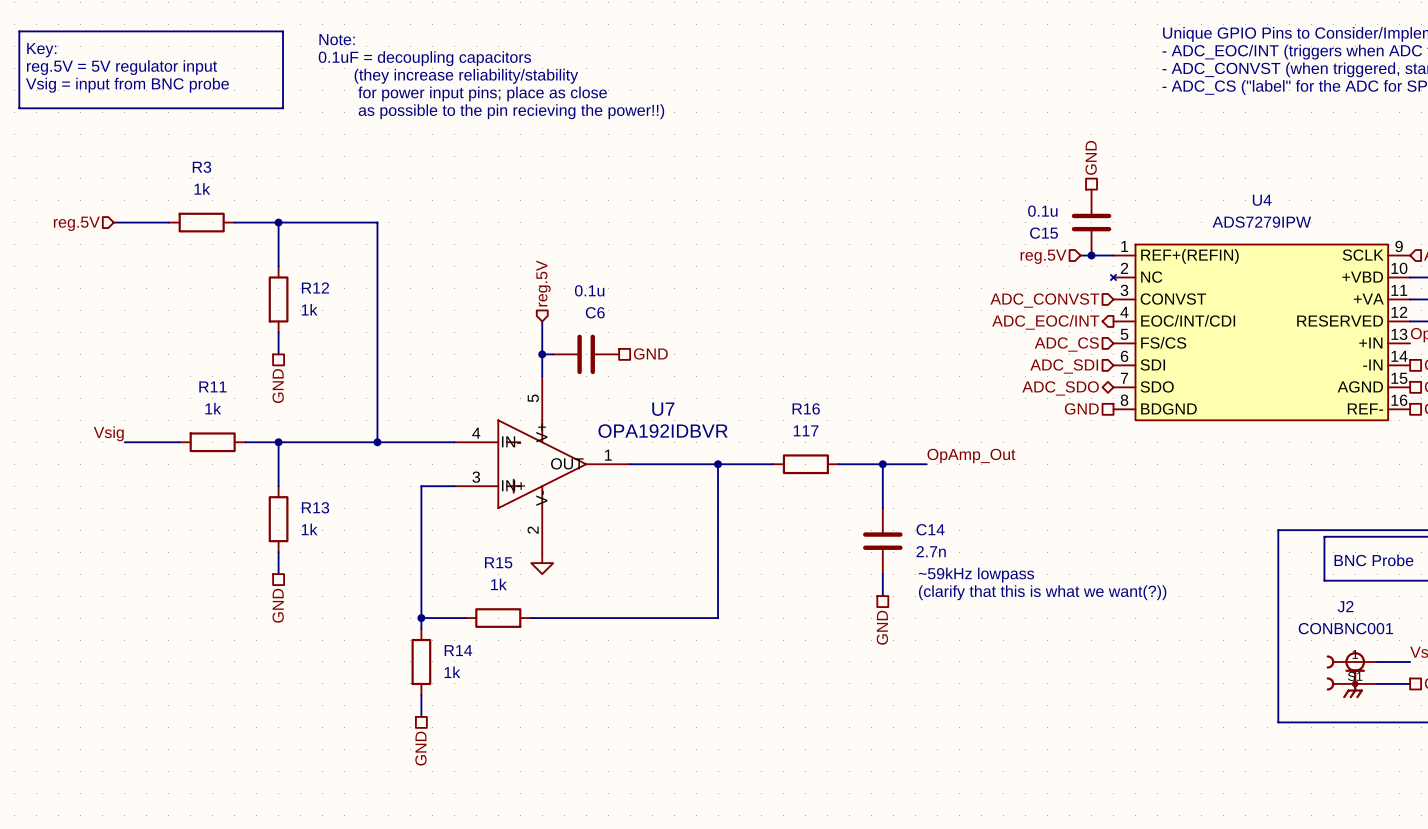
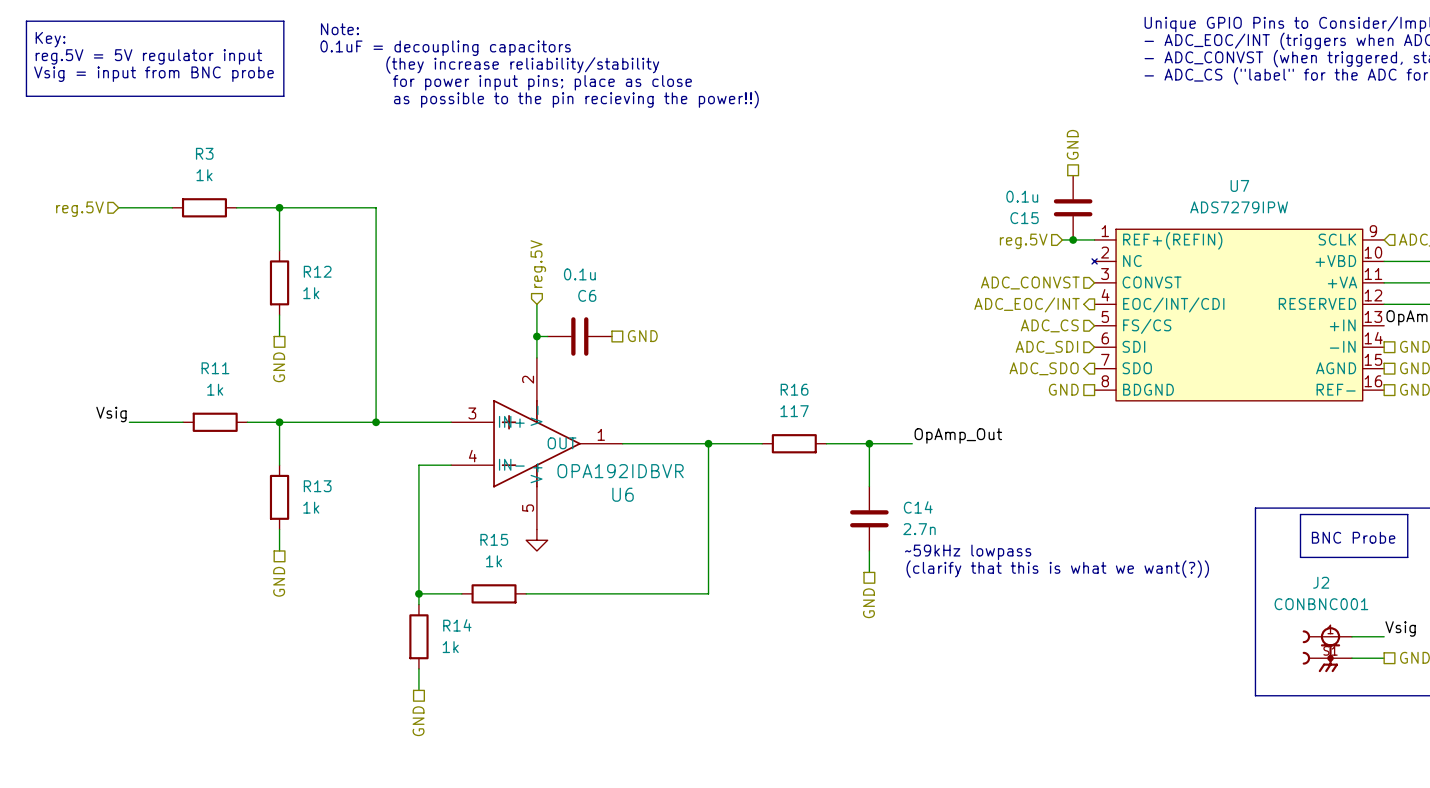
U4 name: U4 (1262, 200) -> U7 (1239, 185)
hierarchical label shape: bidirectional (1060, 388) -> output (1044, 368)
U7: OPA192IDBVR (542, 464) -> none
U6: none -> OPA192IDBVR (536, 443)

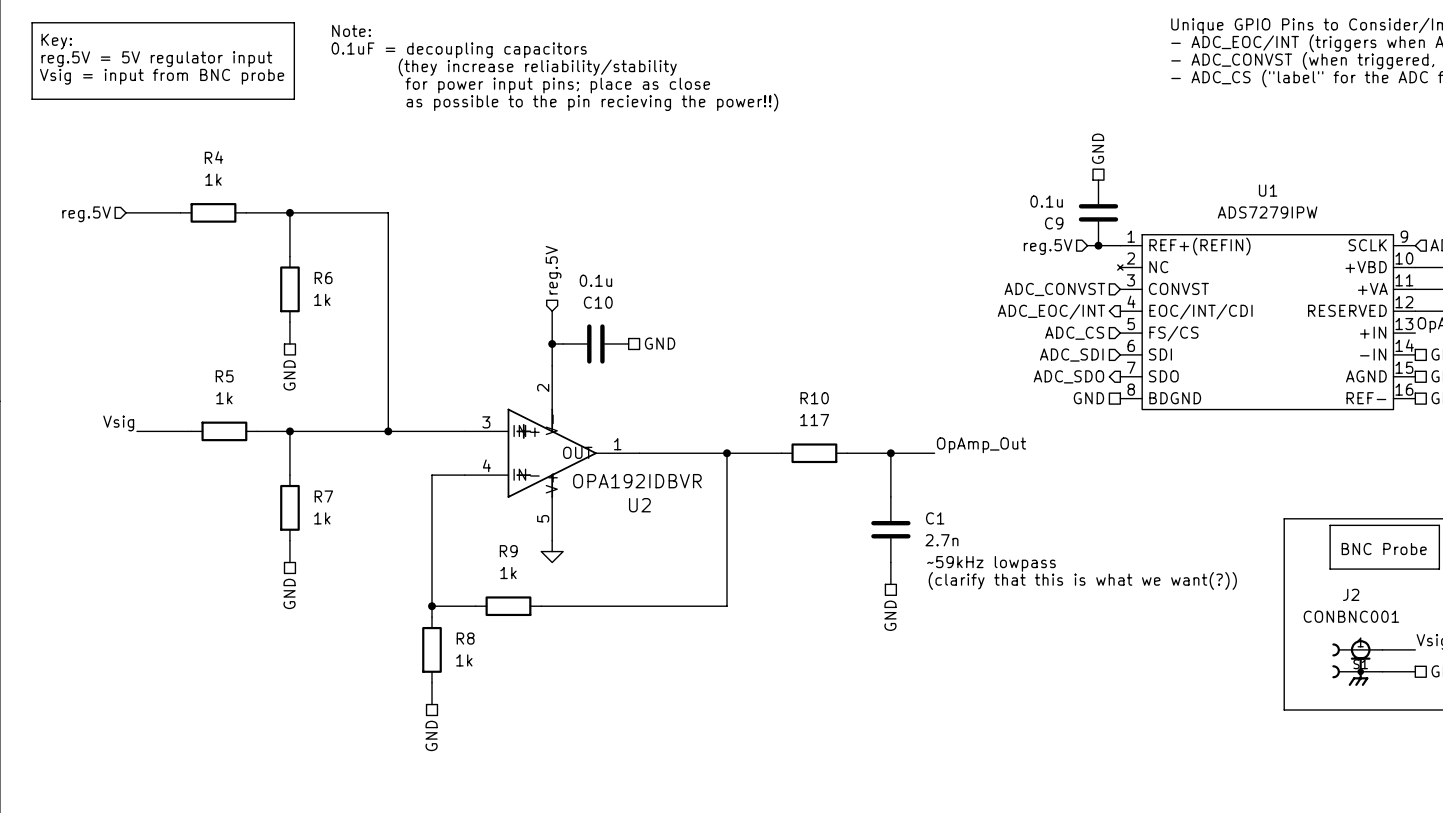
R3 name: R3 (204, 153) -> R4 (214, 157)
U7 name: U7 (1239, 185) -> U1 (1268, 190)
C15 name: C15 (1024, 218) -> C9 (1054, 223)
R12 name: R12 (317, 271) -> R6 (323, 278)
C6 name: C6 (587, 295) -> C10 (598, 302)
R11 name: R11 (215, 368) -> R5 (224, 376)
R16 name: R16 (794, 389) -> R10 (814, 398)
R13 name: R13 (317, 486) -> R7 (323, 496)
U6 name: U6 (623, 494) -> U2 (639, 505)
C14 name: C14 (918, 507) -> C1 (935, 518)
R15 name: R15 (494, 539) -> R9 (508, 551)
R14 name: R14 (457, 625) -> R8 (465, 638)

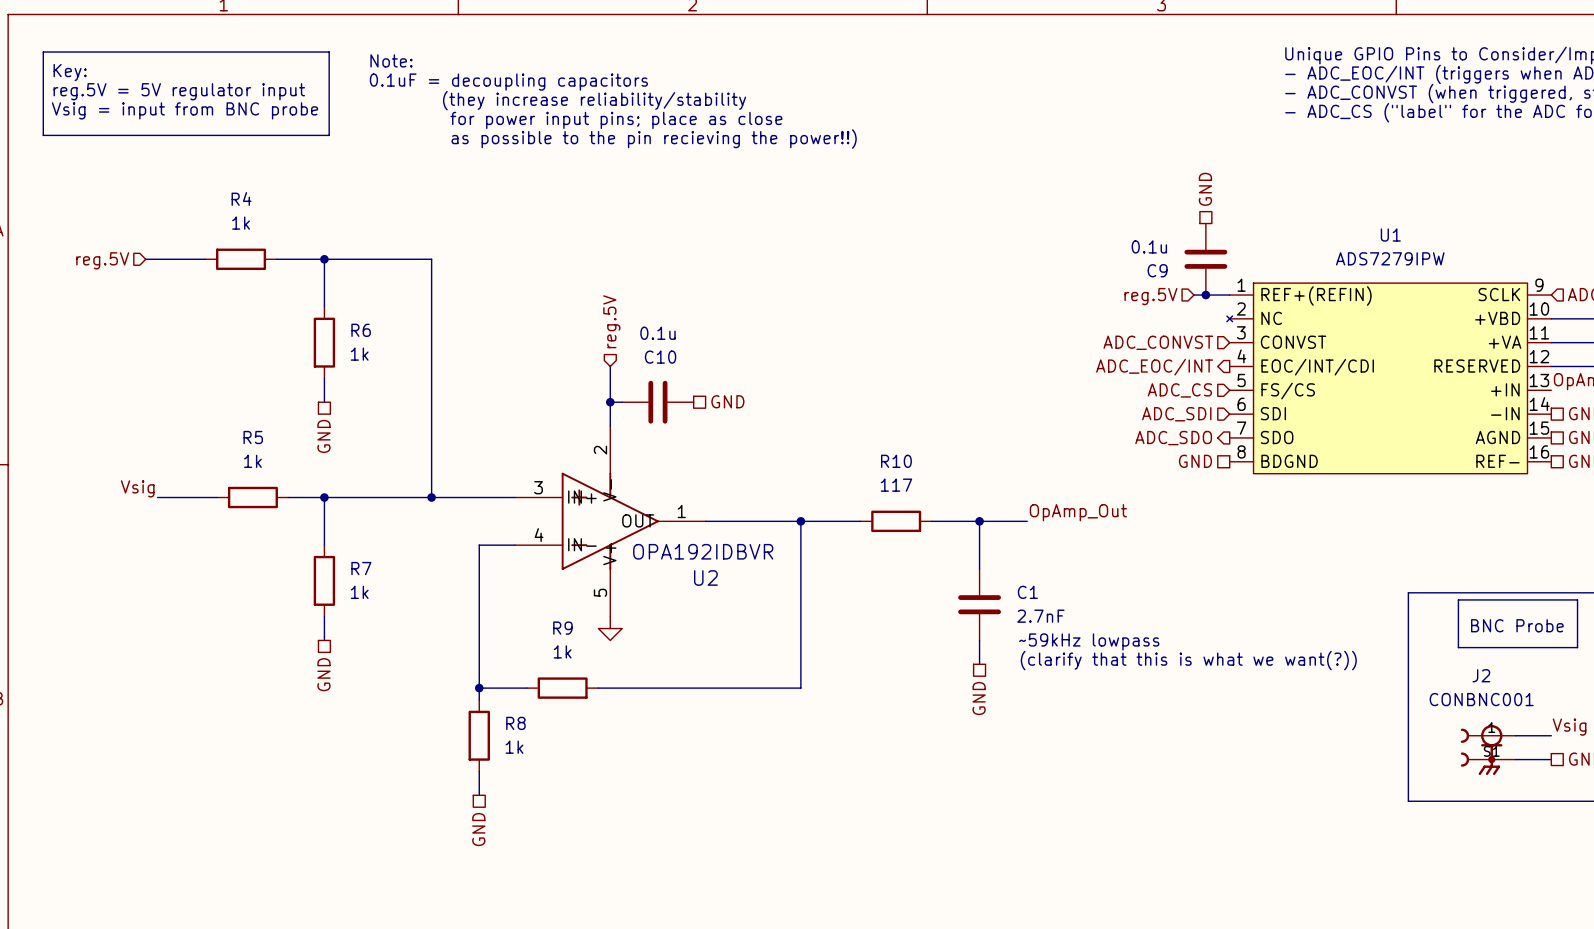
C1 value: 2.7n (941, 540) -> 2.7nF (1040, 616)

